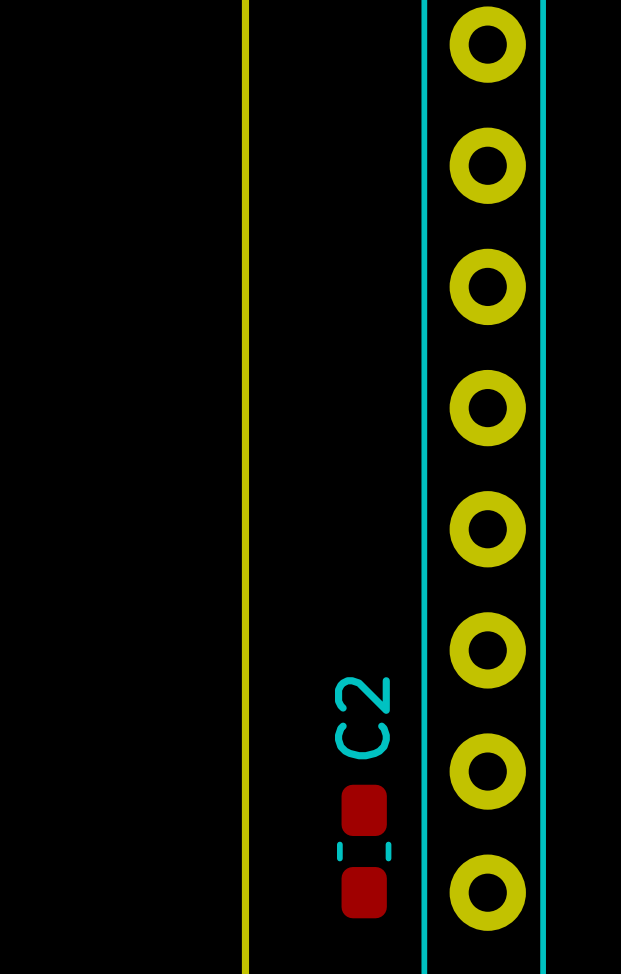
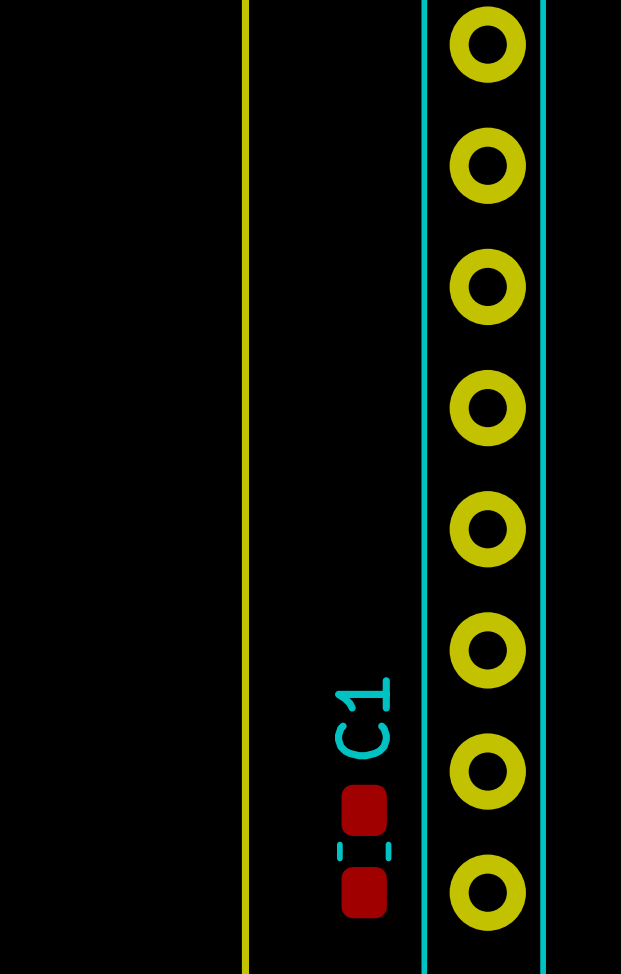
C2 name: C2 (362, 718) -> C1 (362, 718)

